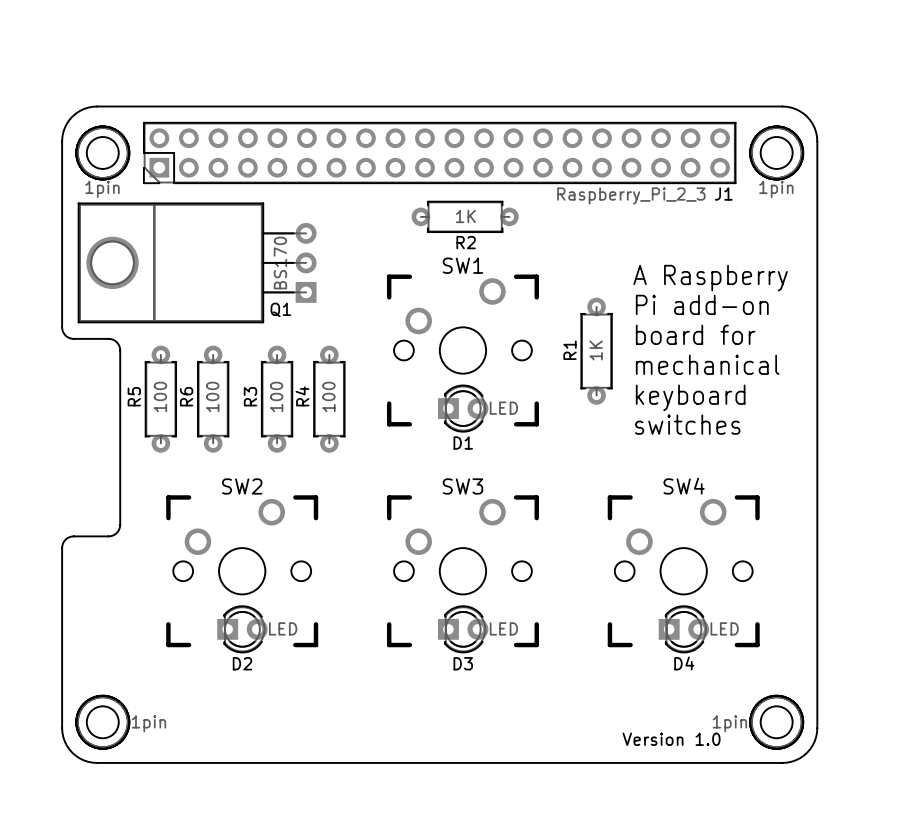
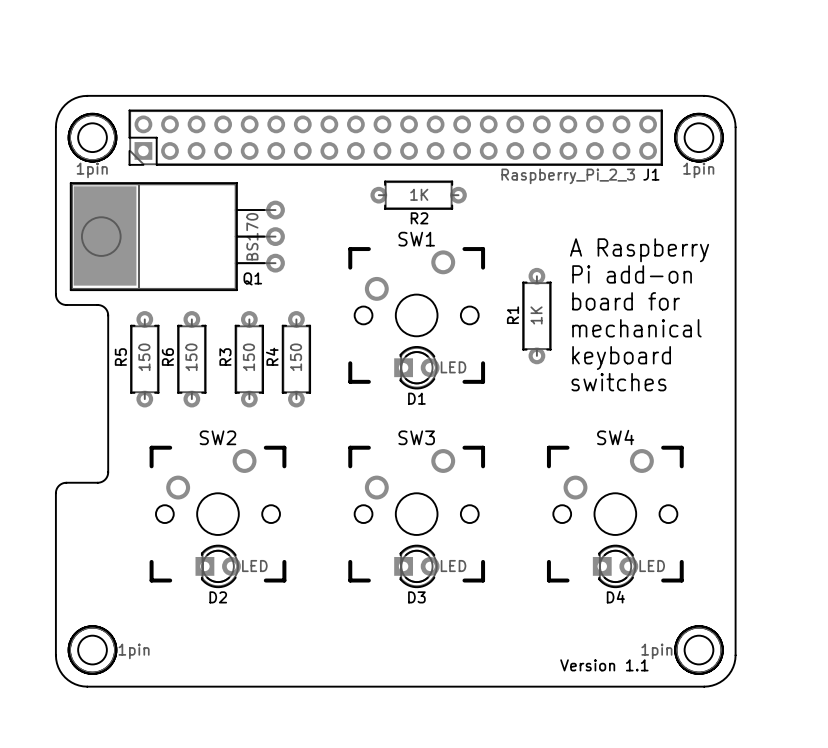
Q1 footprint: [77, 202, 317, 324] -> [70, 182, 285, 291]
R5 value: 100 (160, 396) -> 150 (144, 357)
R6 value: 100 (212, 396) -> 150 (191, 357)
R3 value: 100 (276, 396) -> 150 (248, 357)
R4 value: 100 (328, 396) -> 150 (296, 357)
text: Version 1.0 (671, 739) -> Version 1.1 (604, 665)

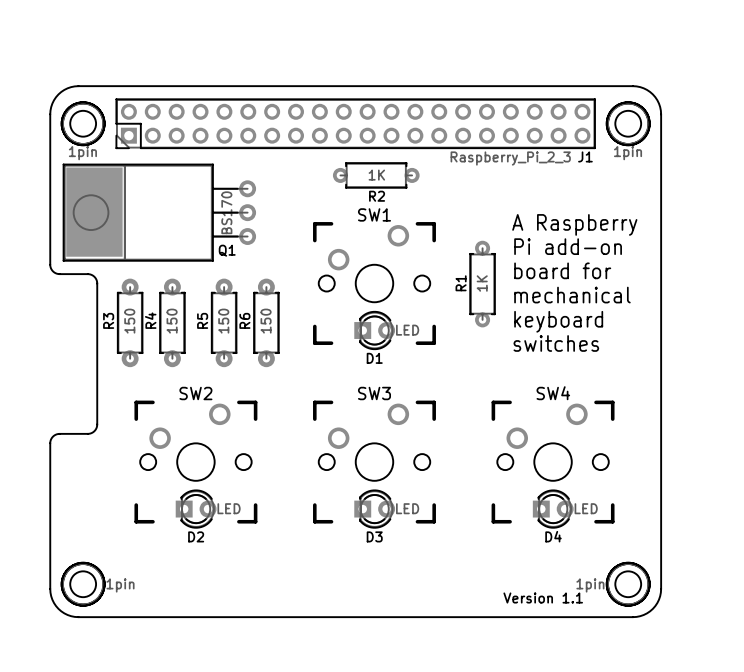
R5 footprint: [130, 311, 160, 408] -> [211, 278, 237, 368]
R6 footprint: [177, 311, 207, 408] -> [253, 278, 280, 368]
R3 footprint: [235, 311, 264, 408] -> [117, 278, 144, 368]
R4 footprint: [282, 311, 311, 408] -> [159, 278, 186, 368]

